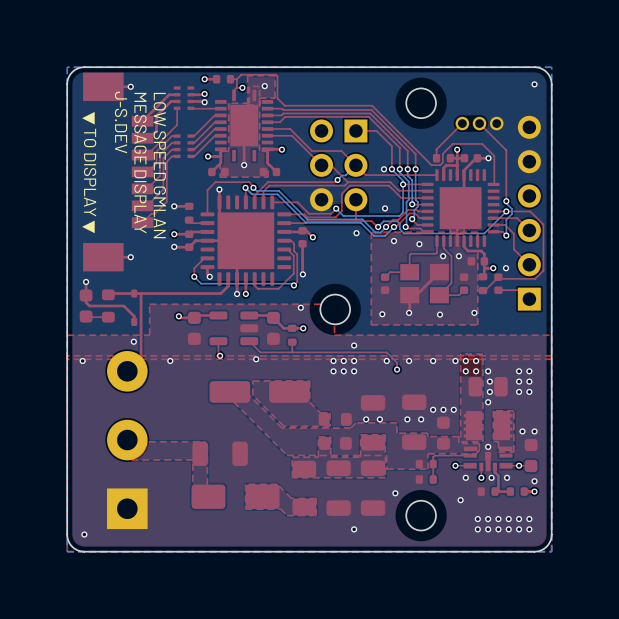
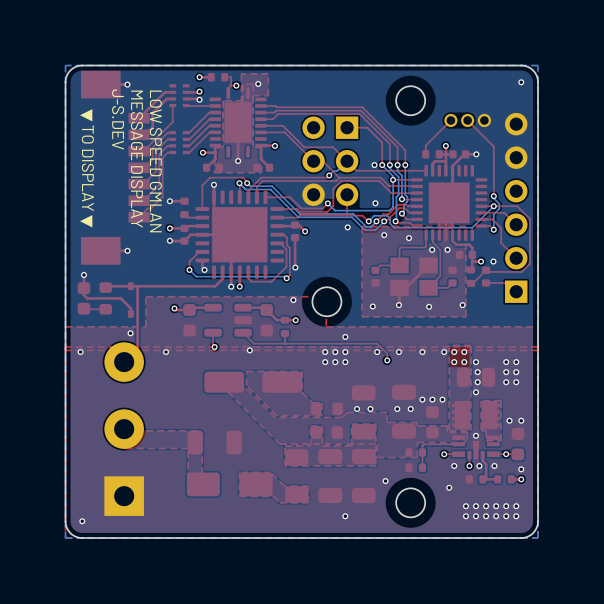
top track: (236, 79) (241, 74) (275, 74) (277, 76) (277, 98) (284, 105) (372, 105) (431, 165) (440, 165) (442, 162) (442, 153) (452, 143) (482, 143) (494, 156) (493, 184) -> none

